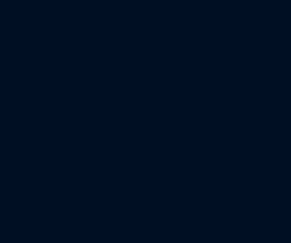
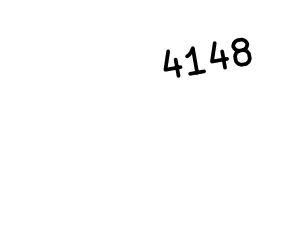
part: none -> 4148 (207, 57)

